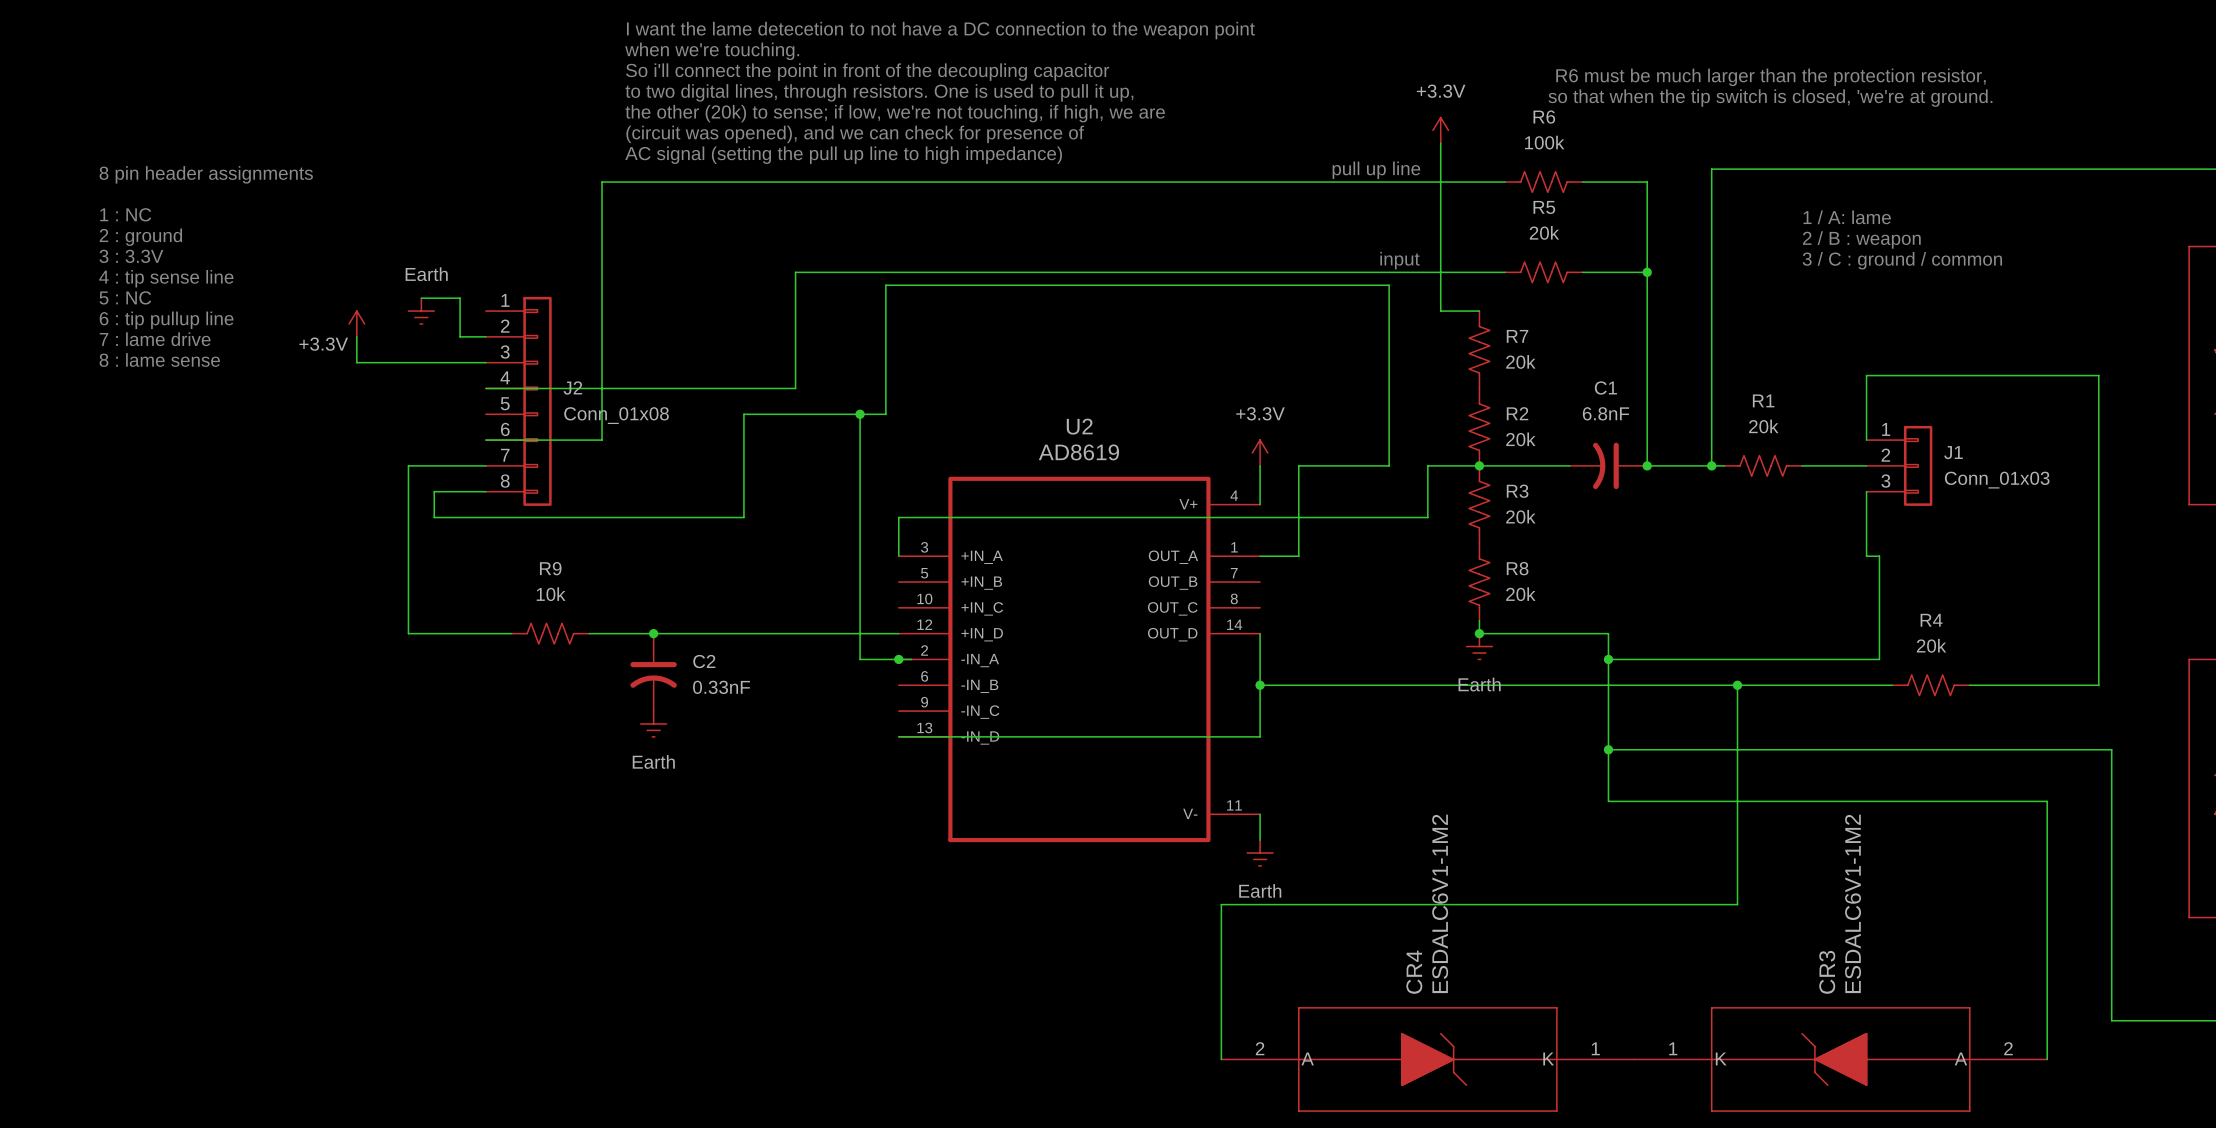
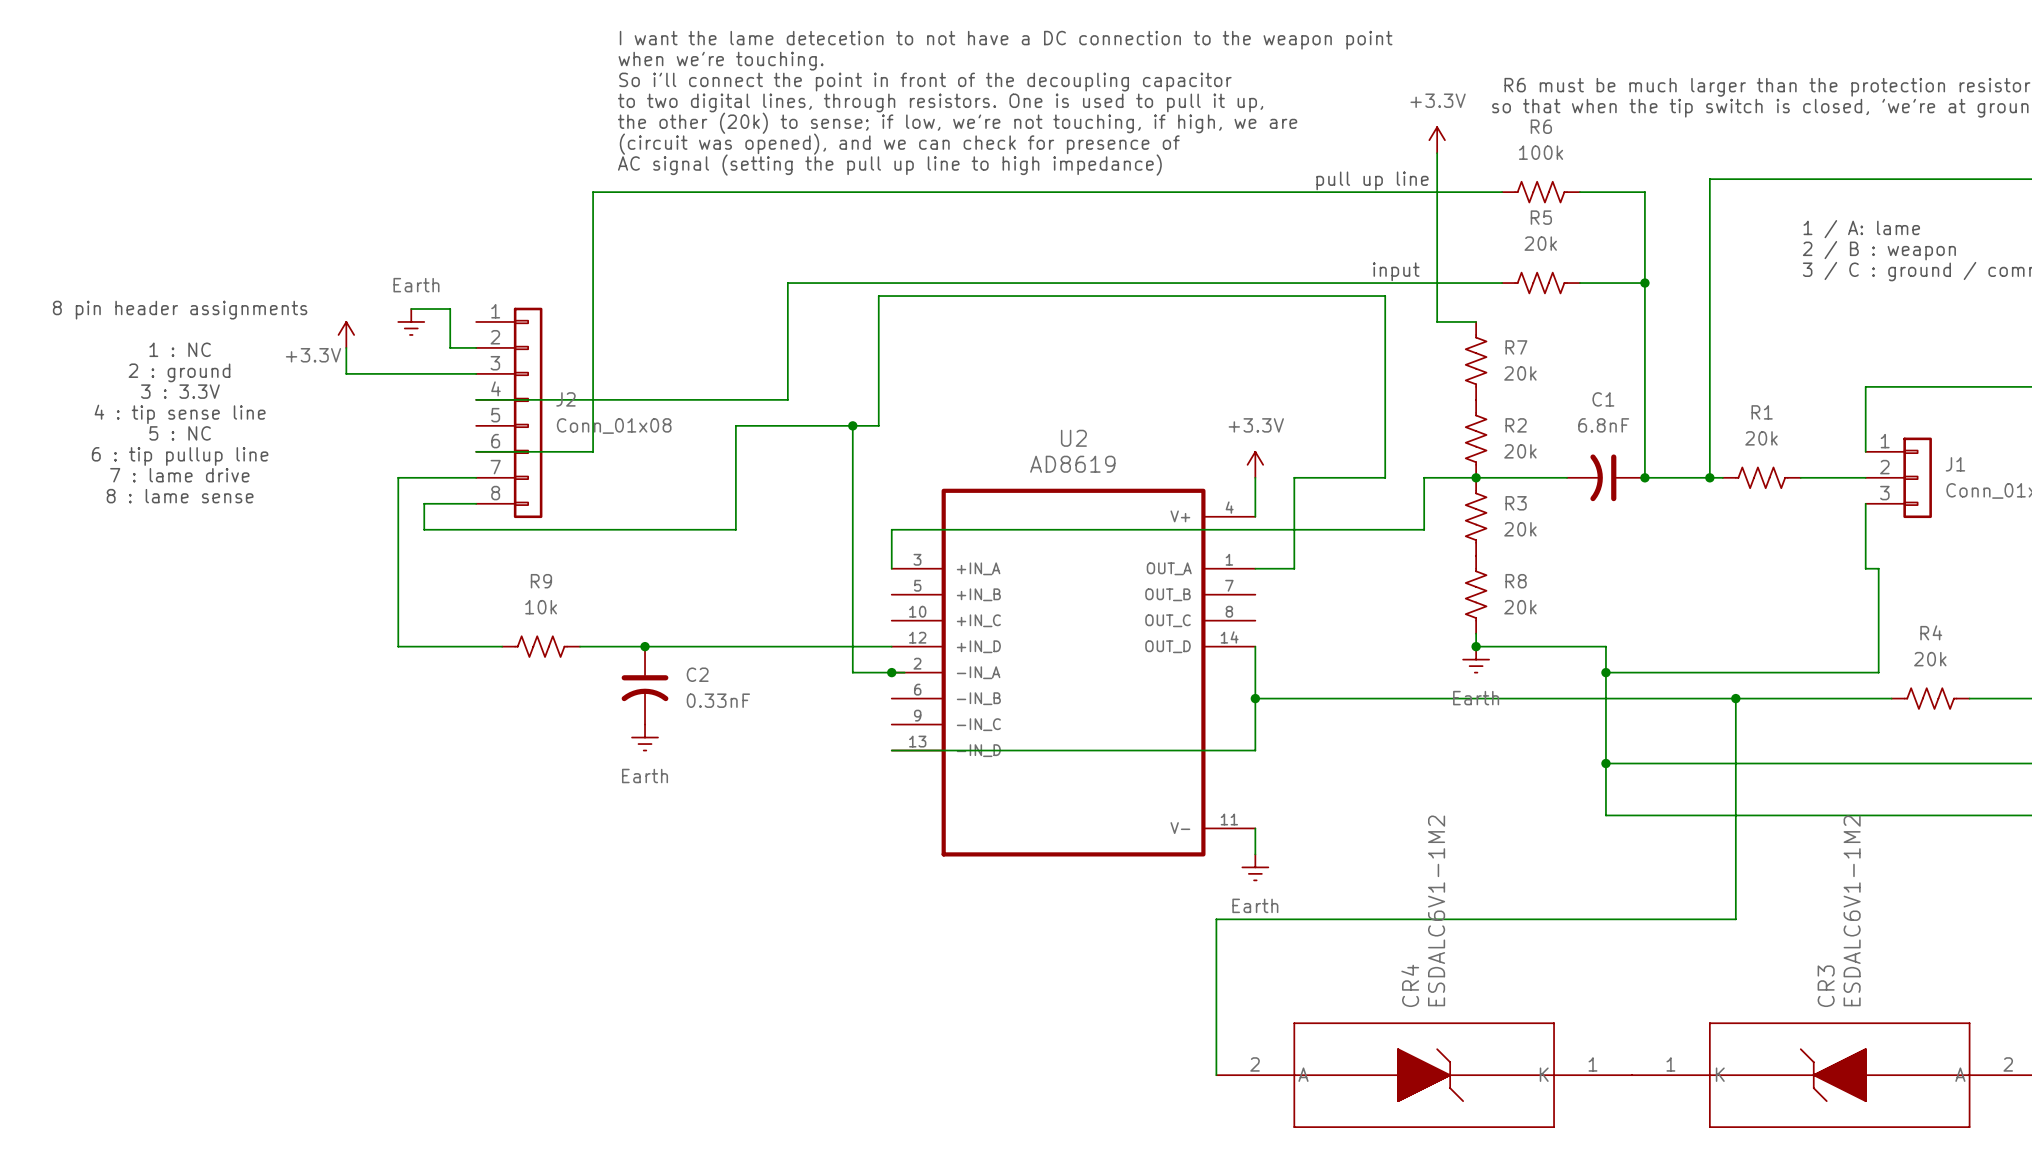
text position: 8 pin header assignments (206, 174) -> 8 pin header assignments (180, 310)
text position: 1 : NC (125, 214) -> 1 : NC (180, 349)
text position: 2 : ground (140, 237) -> 2 : ground (179, 372)
text position: 3 : 3.3V (131, 256) -> 3 : 3.3V (180, 391)
text position: 4 : tip sense line (166, 278) -> 4 : tip sense line (180, 414)
text position: 5 : NC (125, 297) -> 5 : NC (180, 433)
text position: 6 : tip pullup line (166, 320) -> 6 : tip pullup line (180, 456)
text position: 7 : lame drive (155, 339) -> 7 : lame drive (179, 475)
text position: 8 : lame sense (159, 359) -> 8 : lame sense (180, 496)

